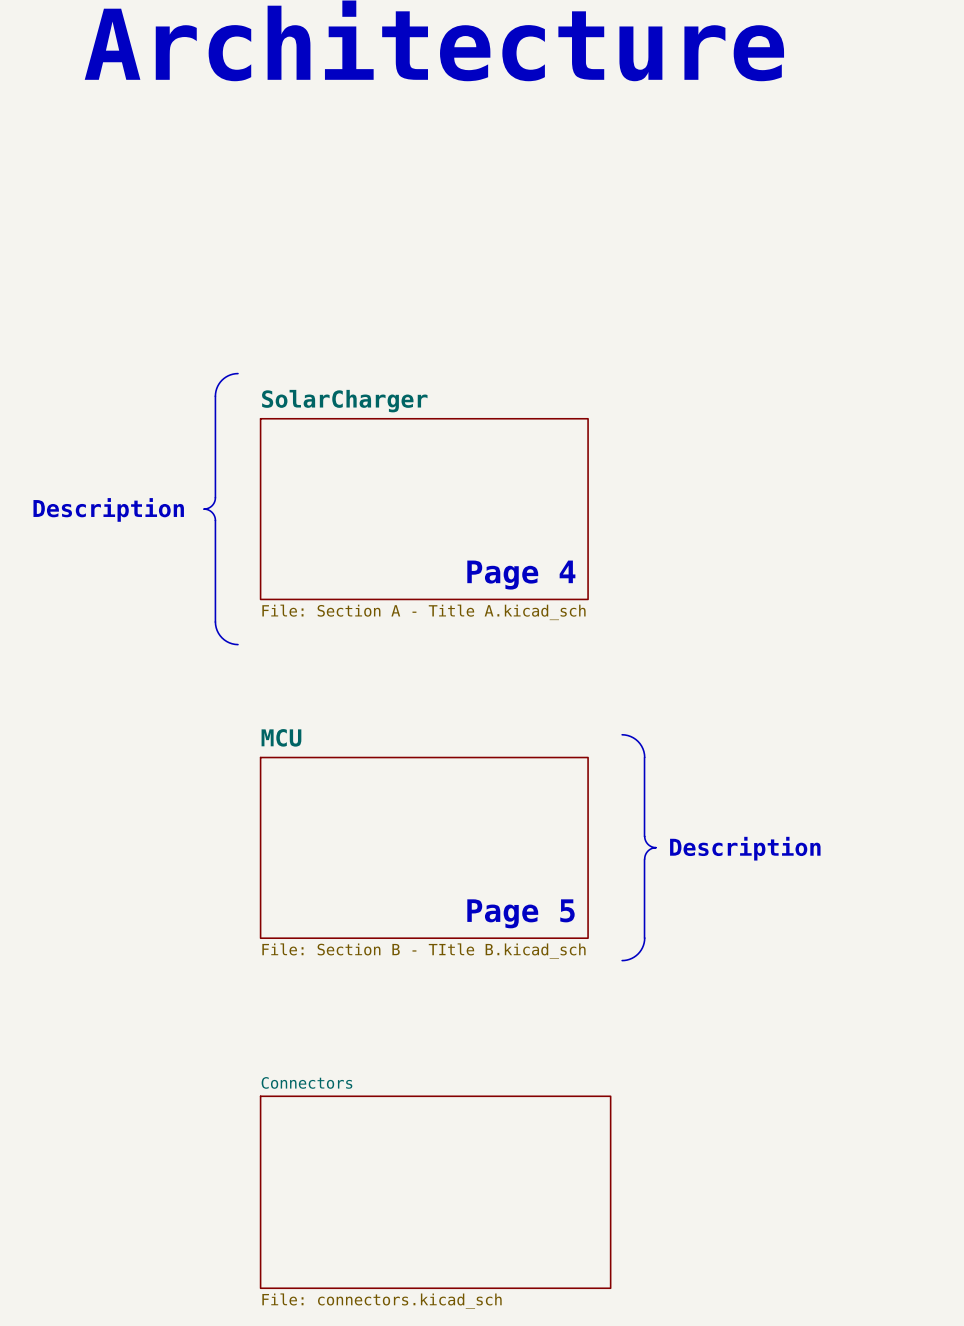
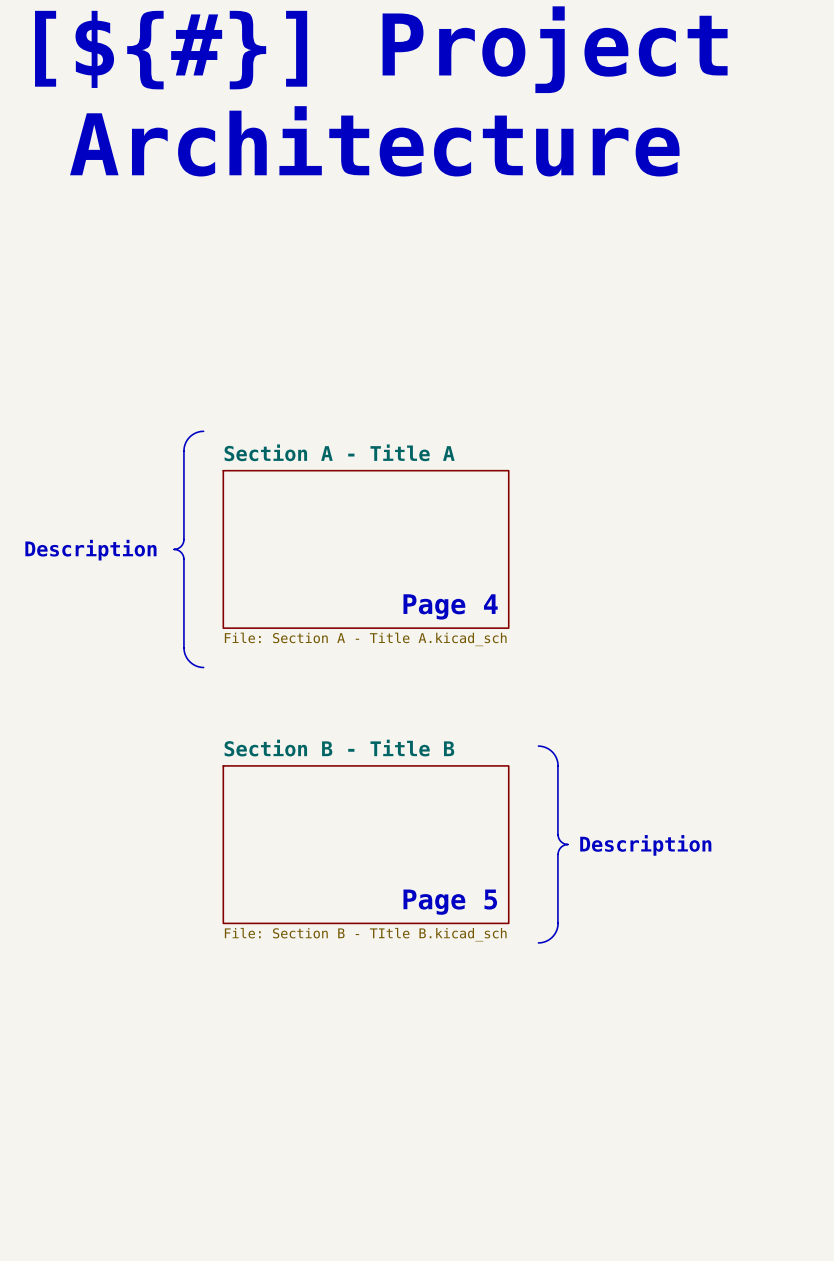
sheet SolarCharger name: SolarCharger (344, 401) -> Section A - Title A (339, 452)
sheet MCU name: MCU (281, 737) -> Section B - Title B (339, 748)
sheet Connectors: File: connectors.kicad_sch (435, 1192) -> none

